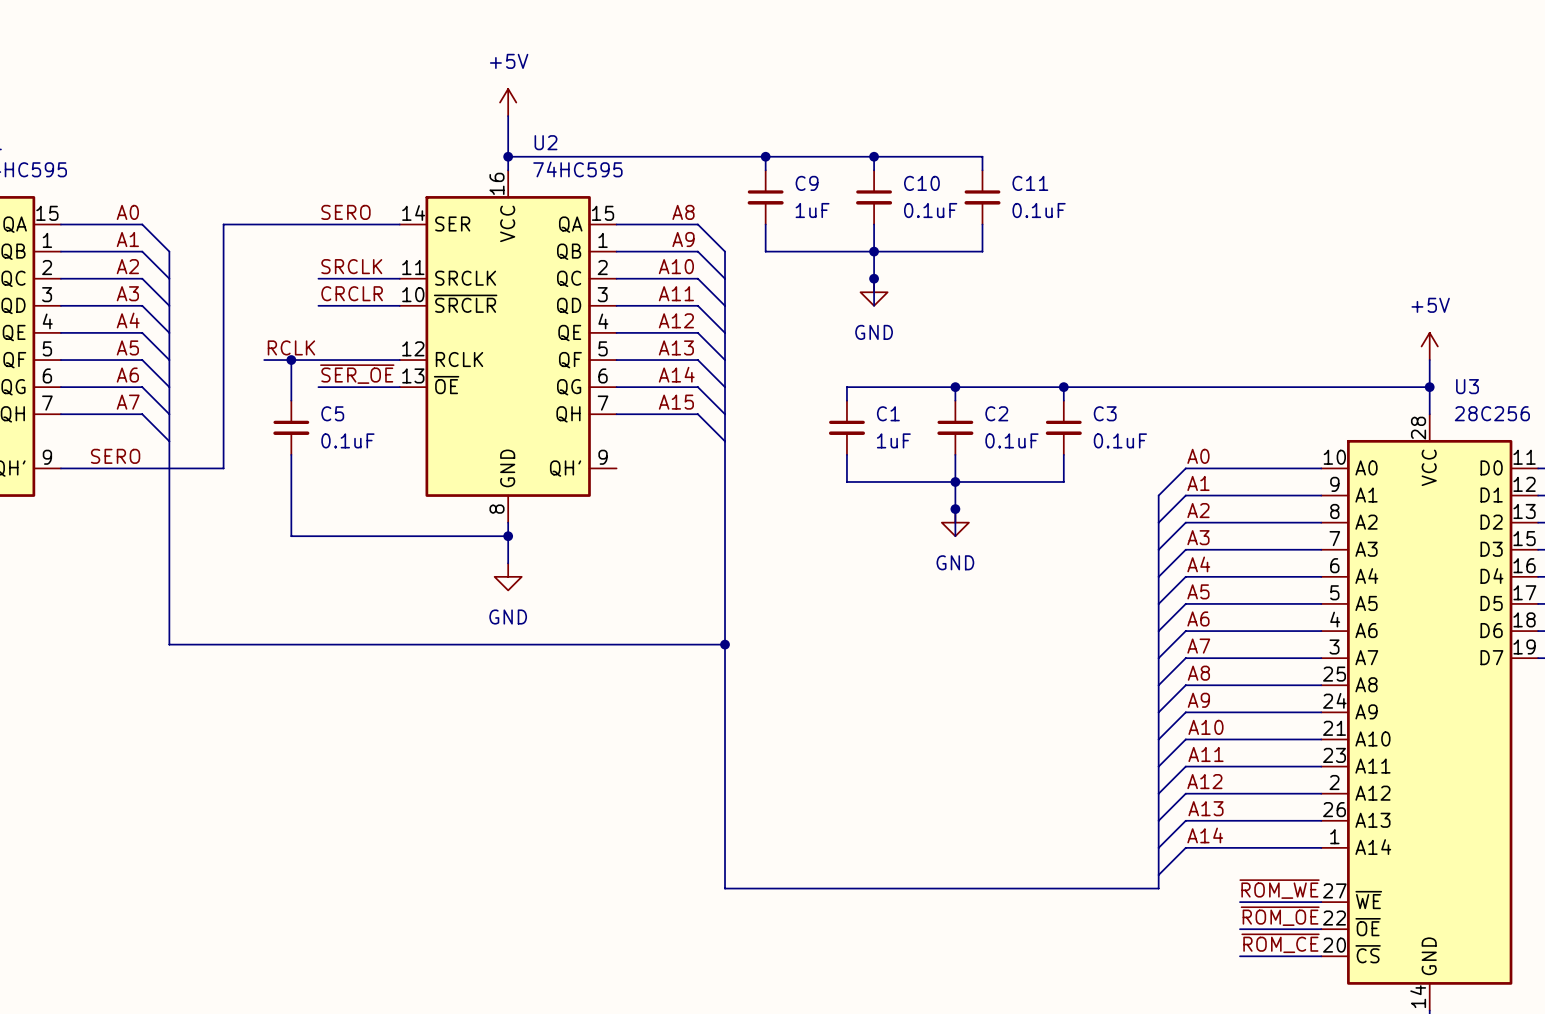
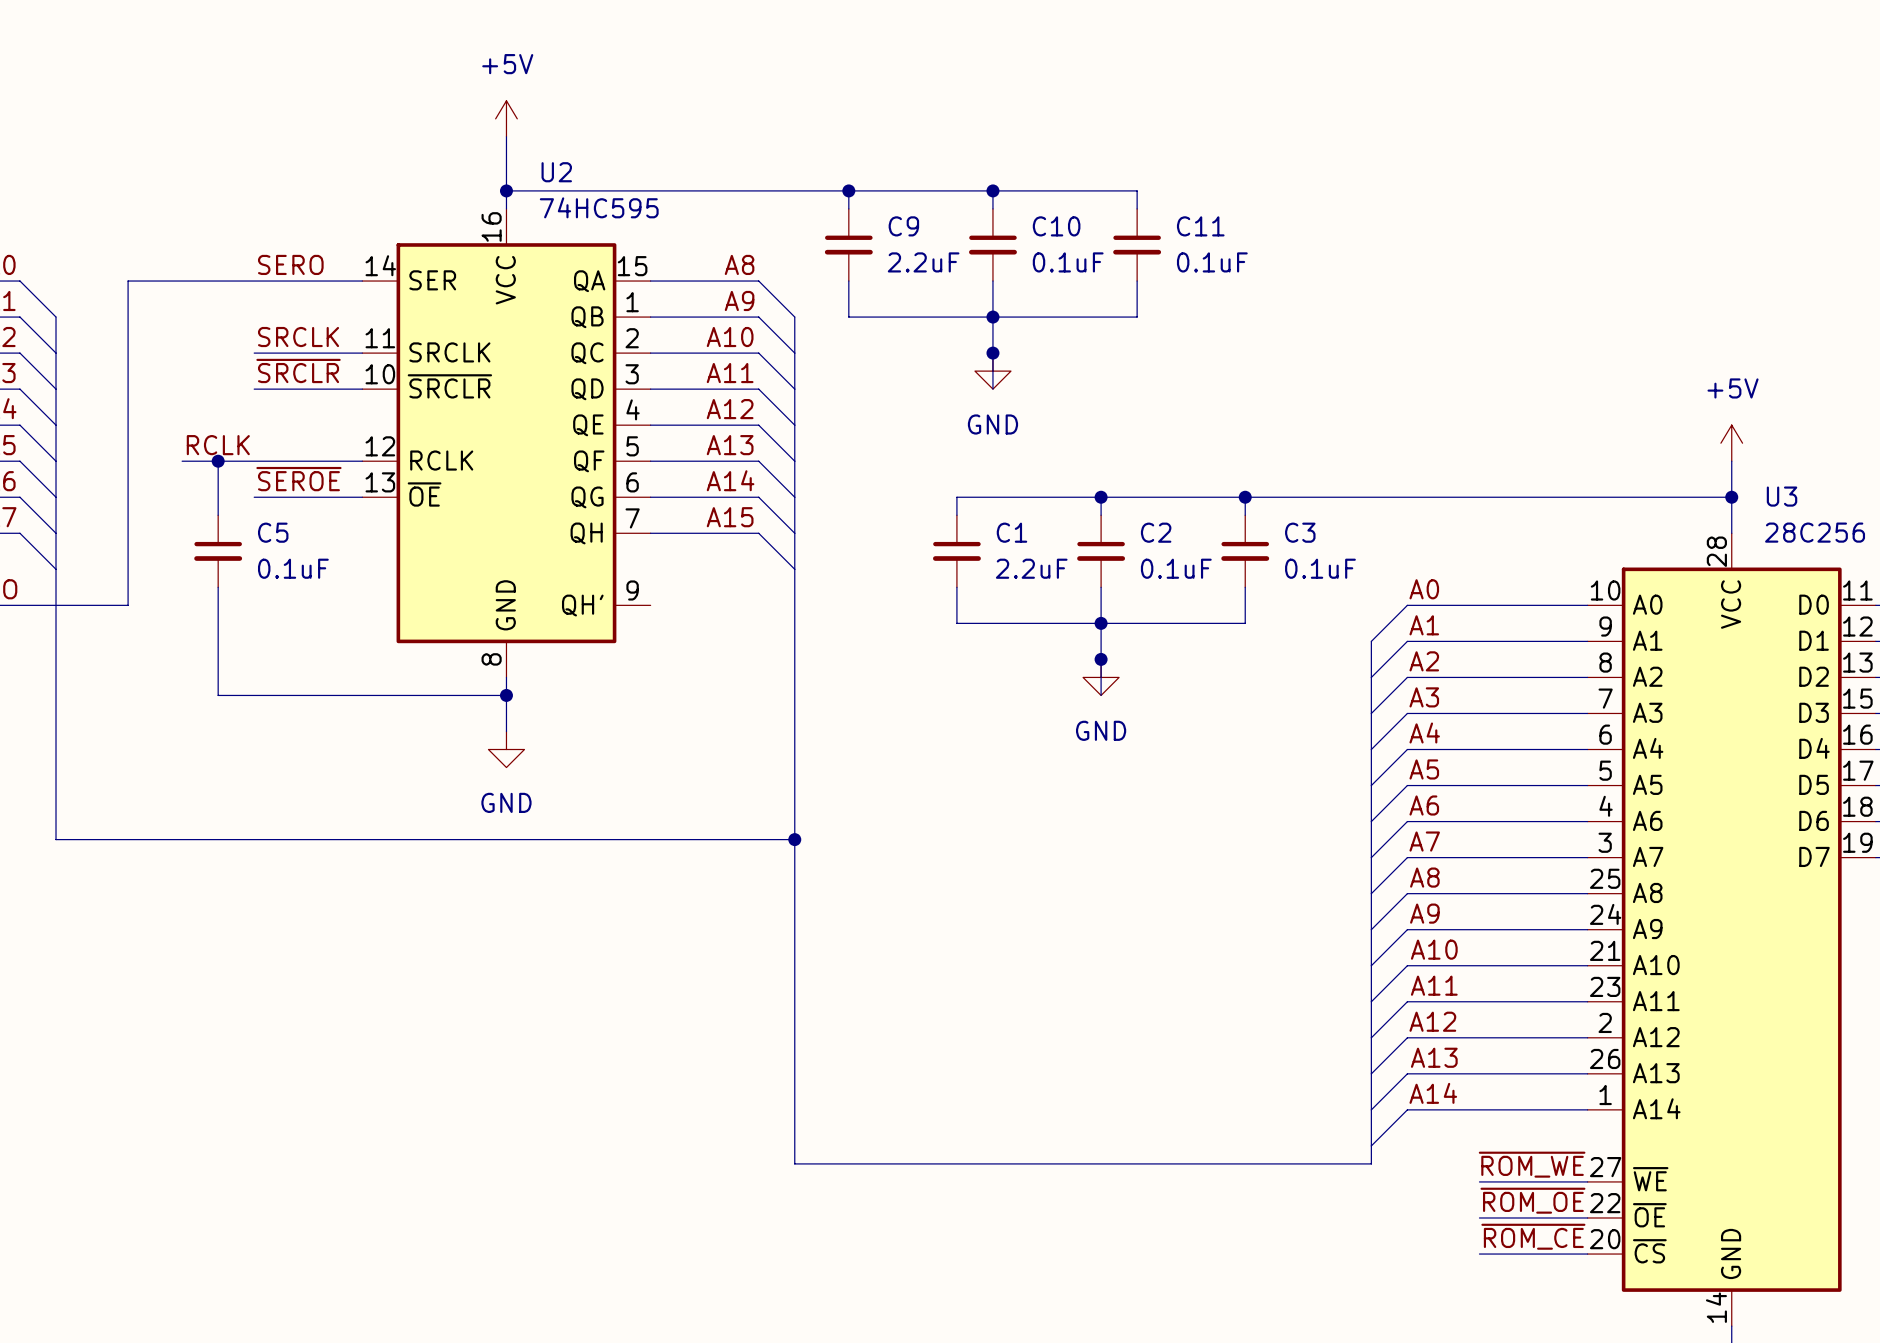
C9 value: 1uF (812, 210) -> 2.2uF (923, 262)
label: CRCLR (352, 293) -> ~{SRCLR} (298, 370)
label: ~{SER_OE} (357, 374) -> ~{SEROE} (298, 479)
C1 value: 1uF (893, 440) -> 2.2uF (1031, 568)

